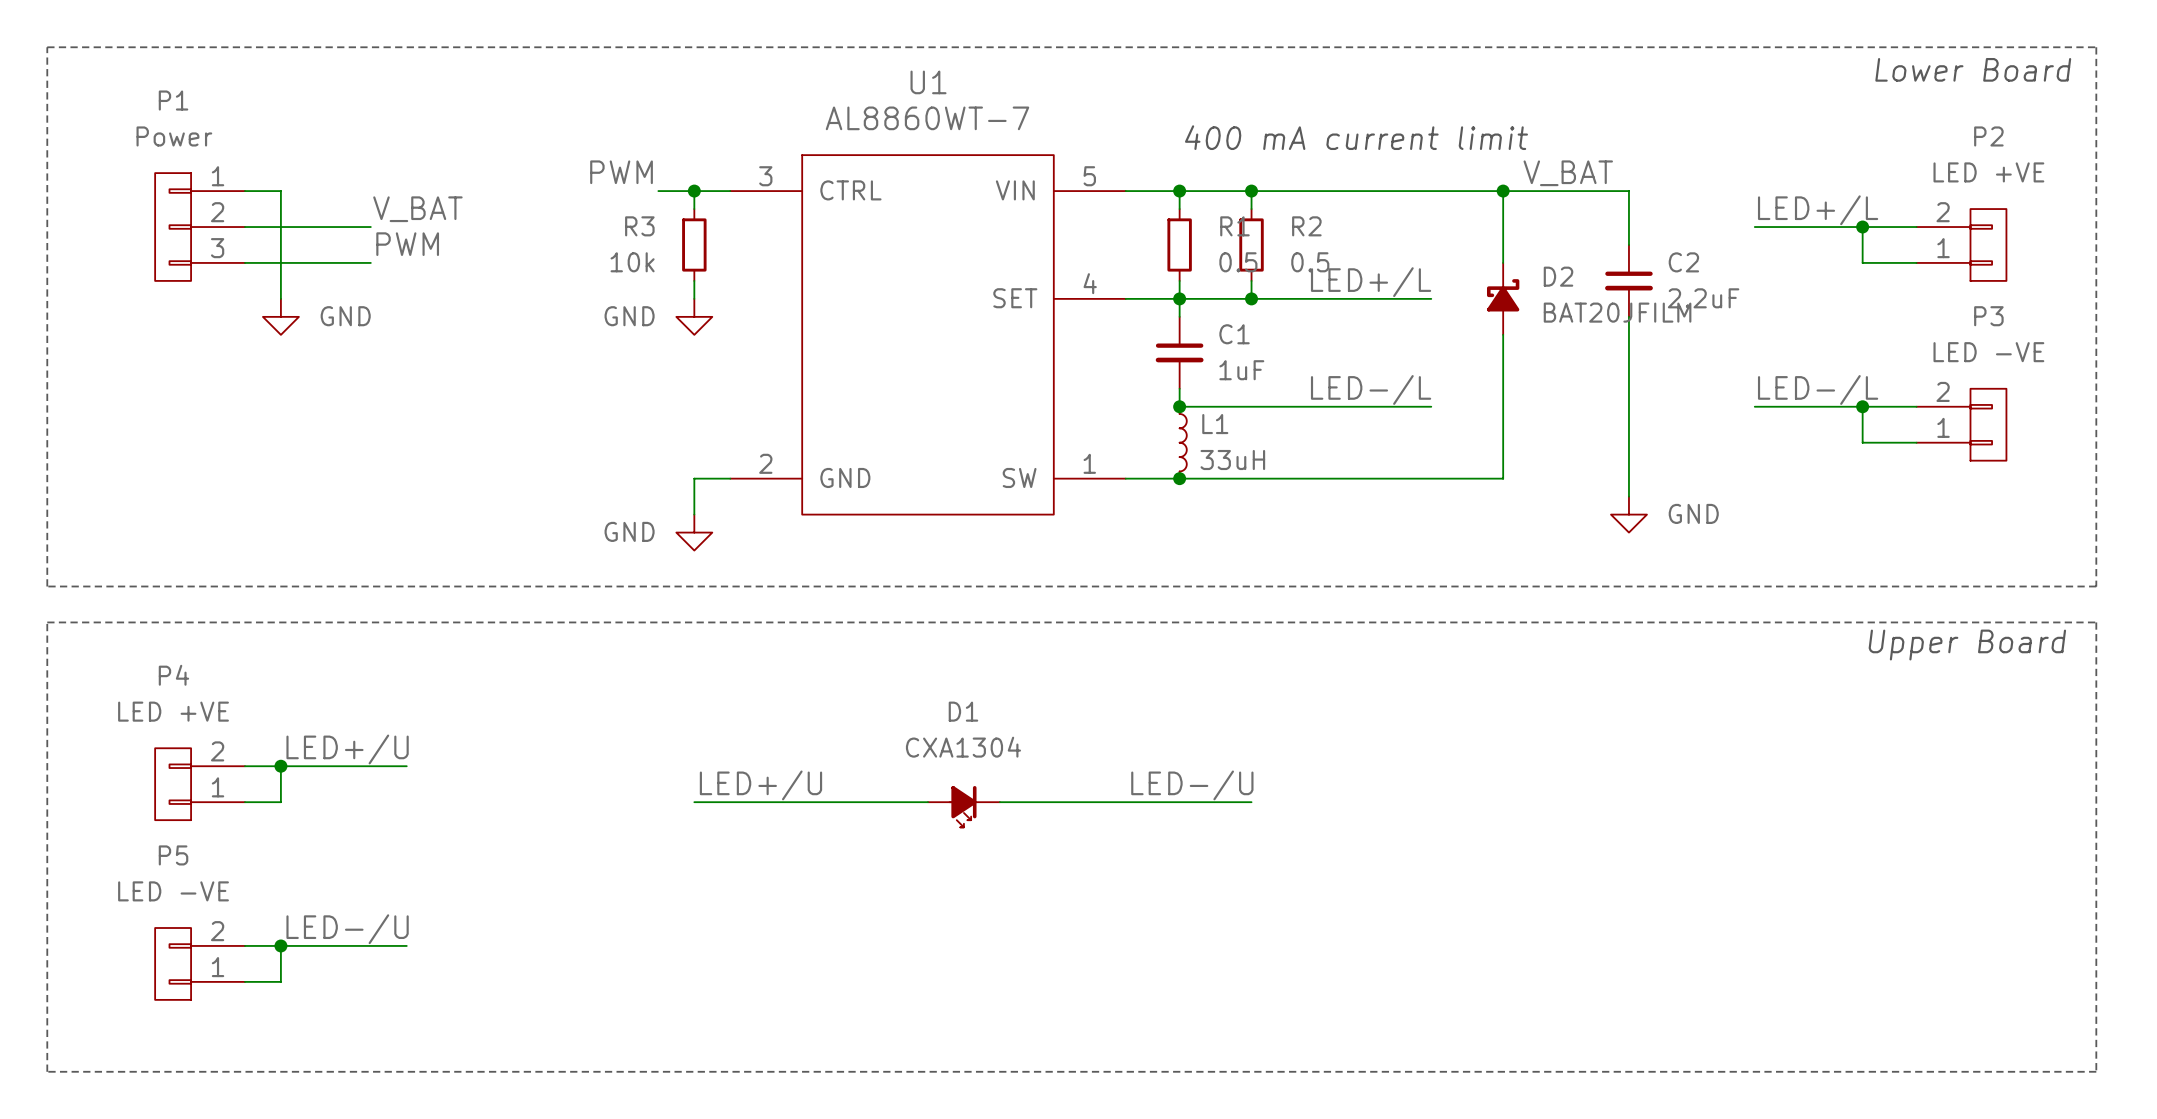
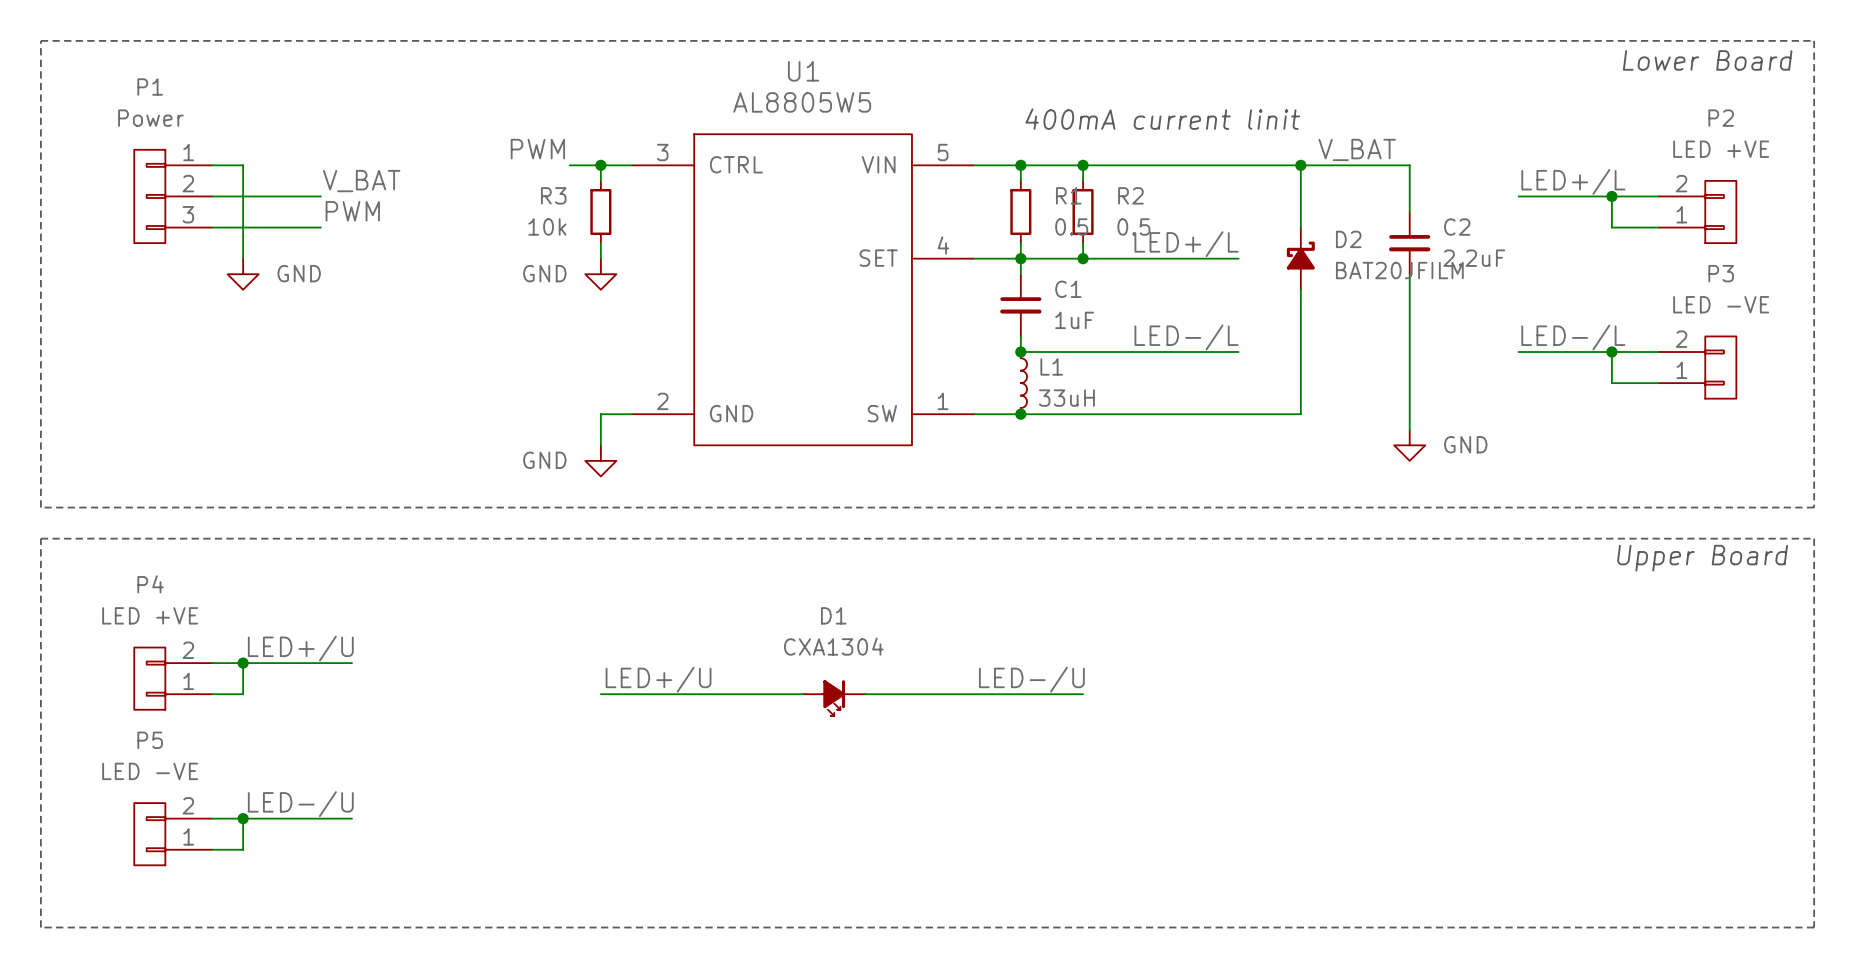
U1 value: AL8860WT-7 (927, 118) -> AL8805W5 (802, 102)
text: 400 mA current limit (1356, 137) -> 400mA current linit (1162, 119)

